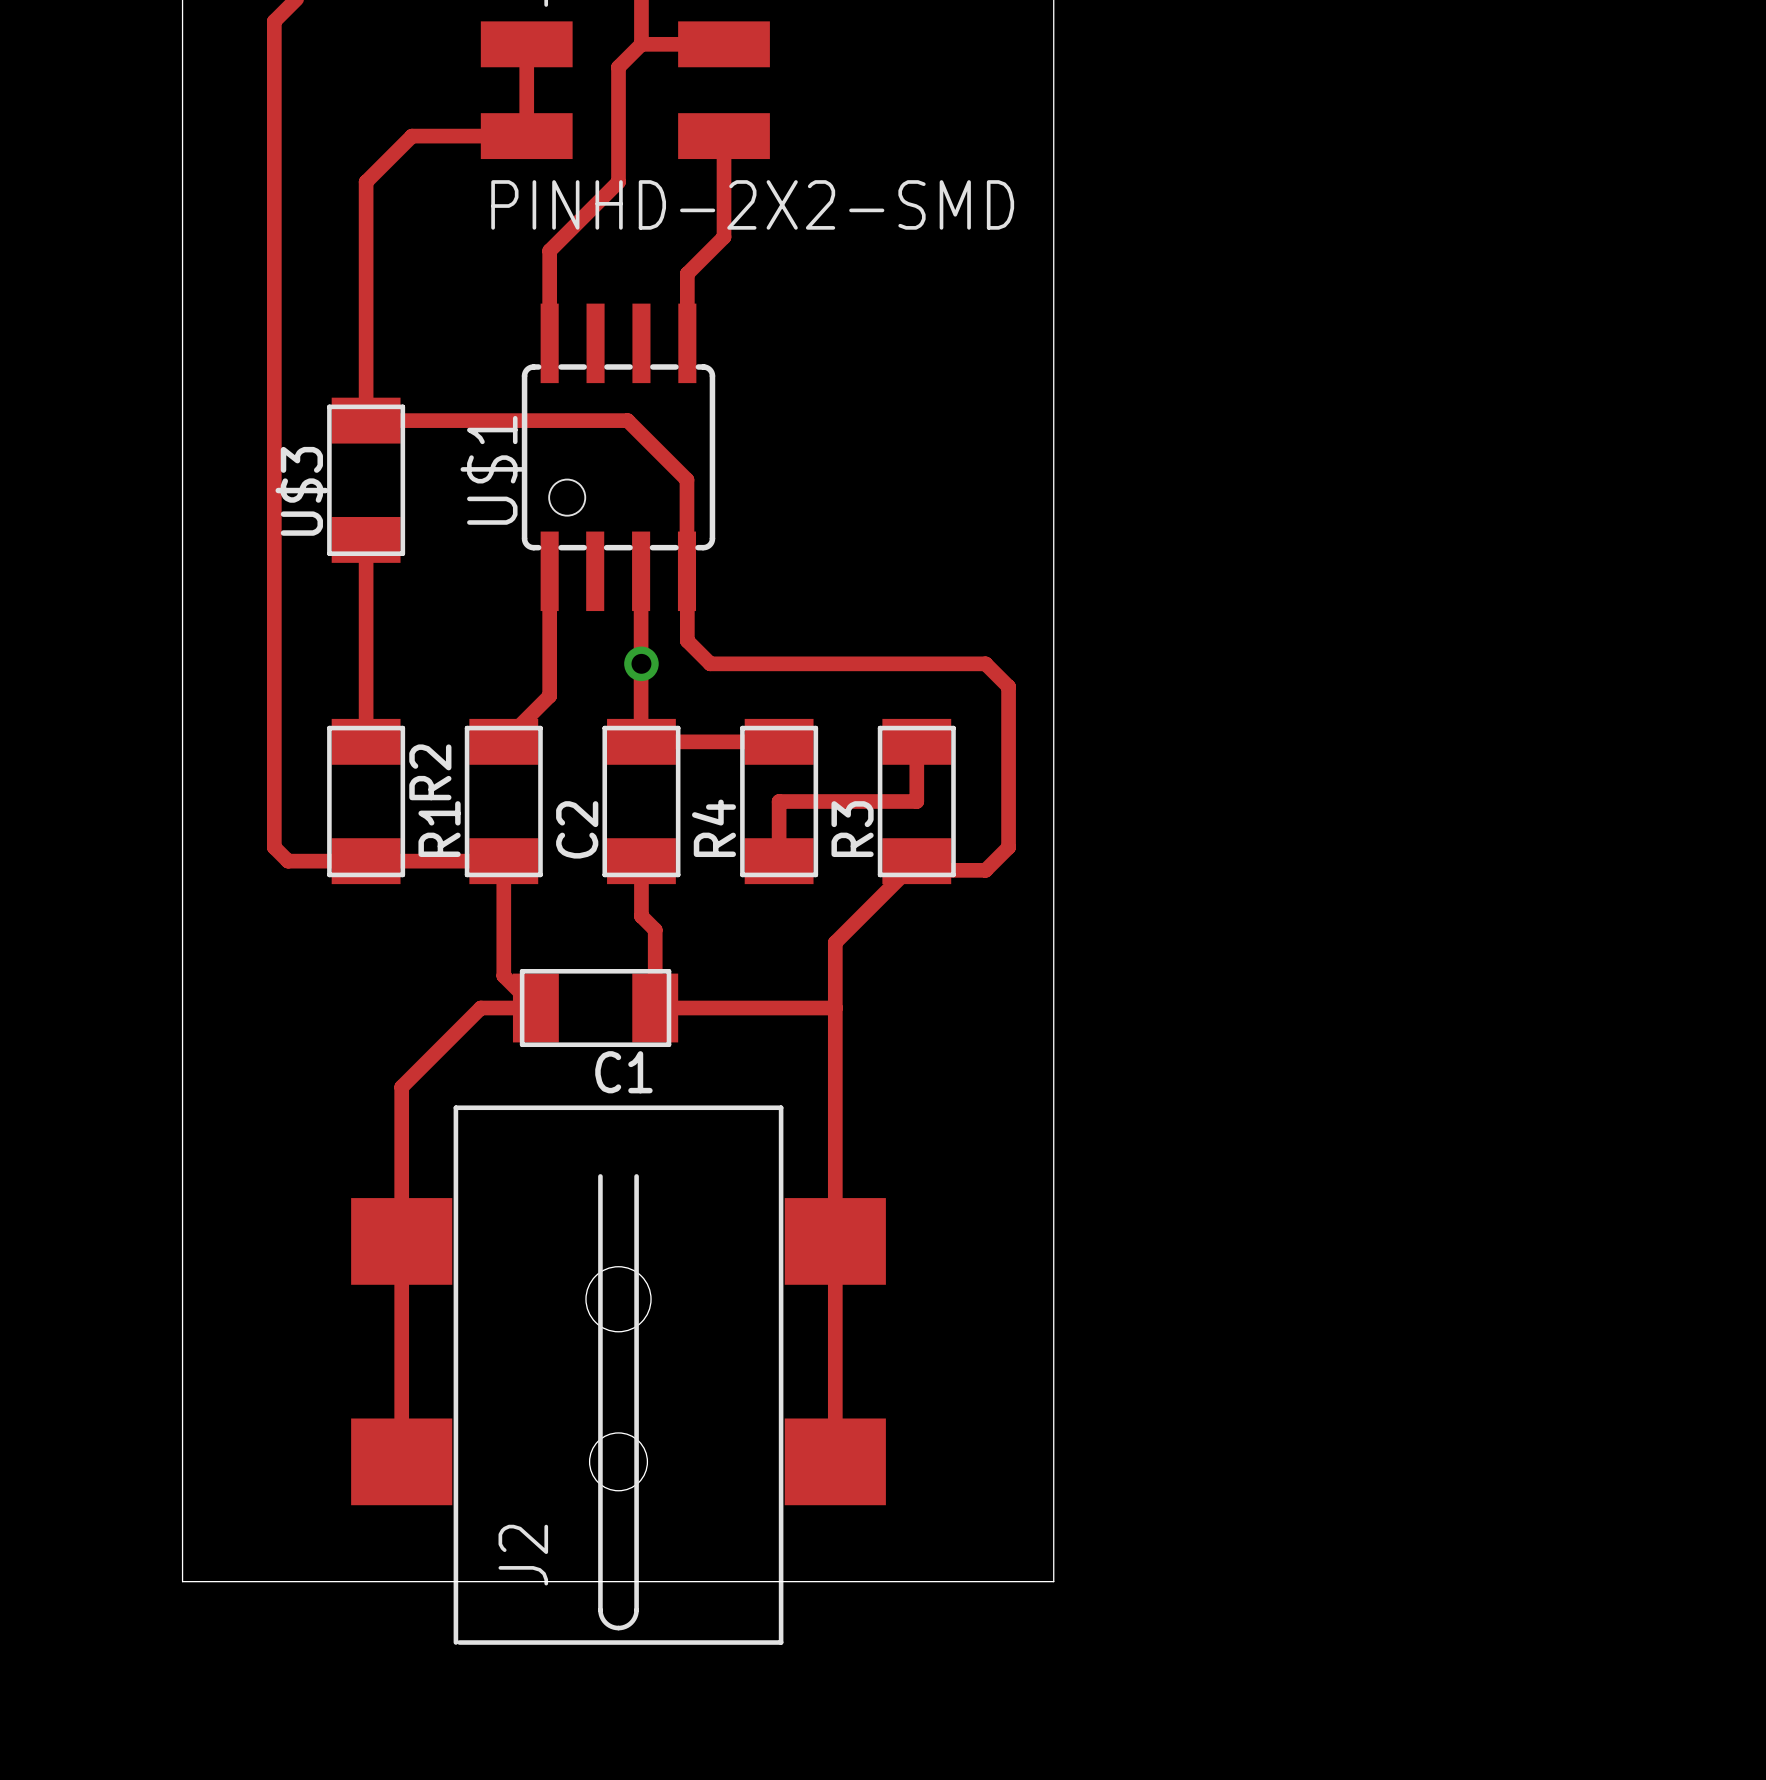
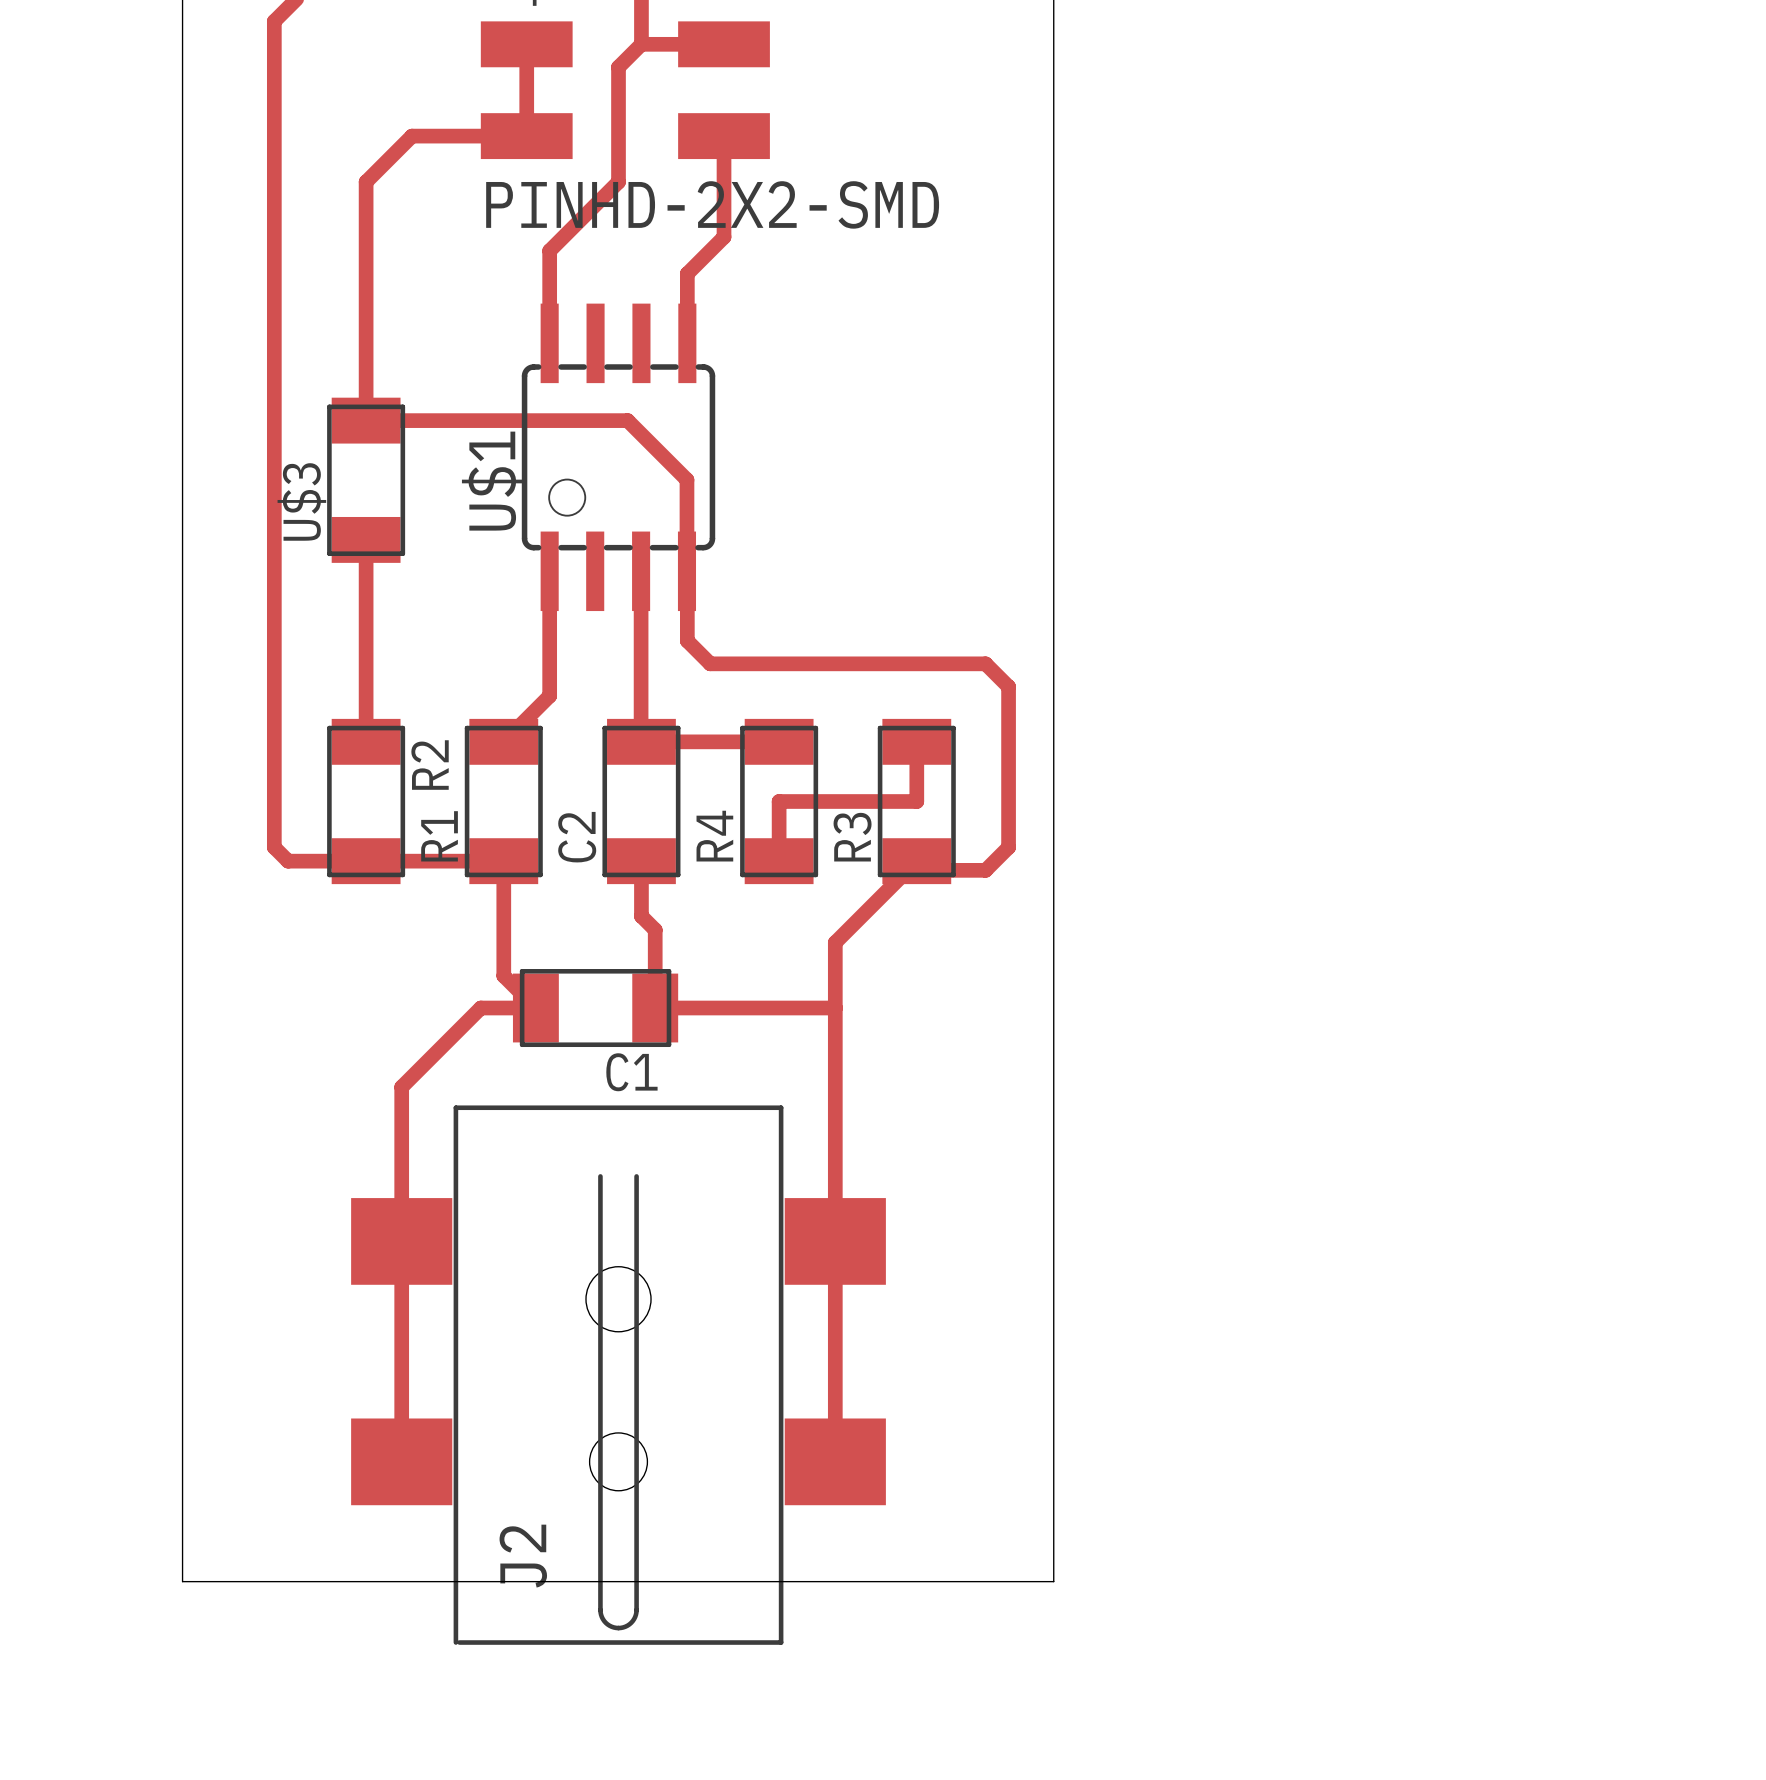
via: (641, 663) -> none

